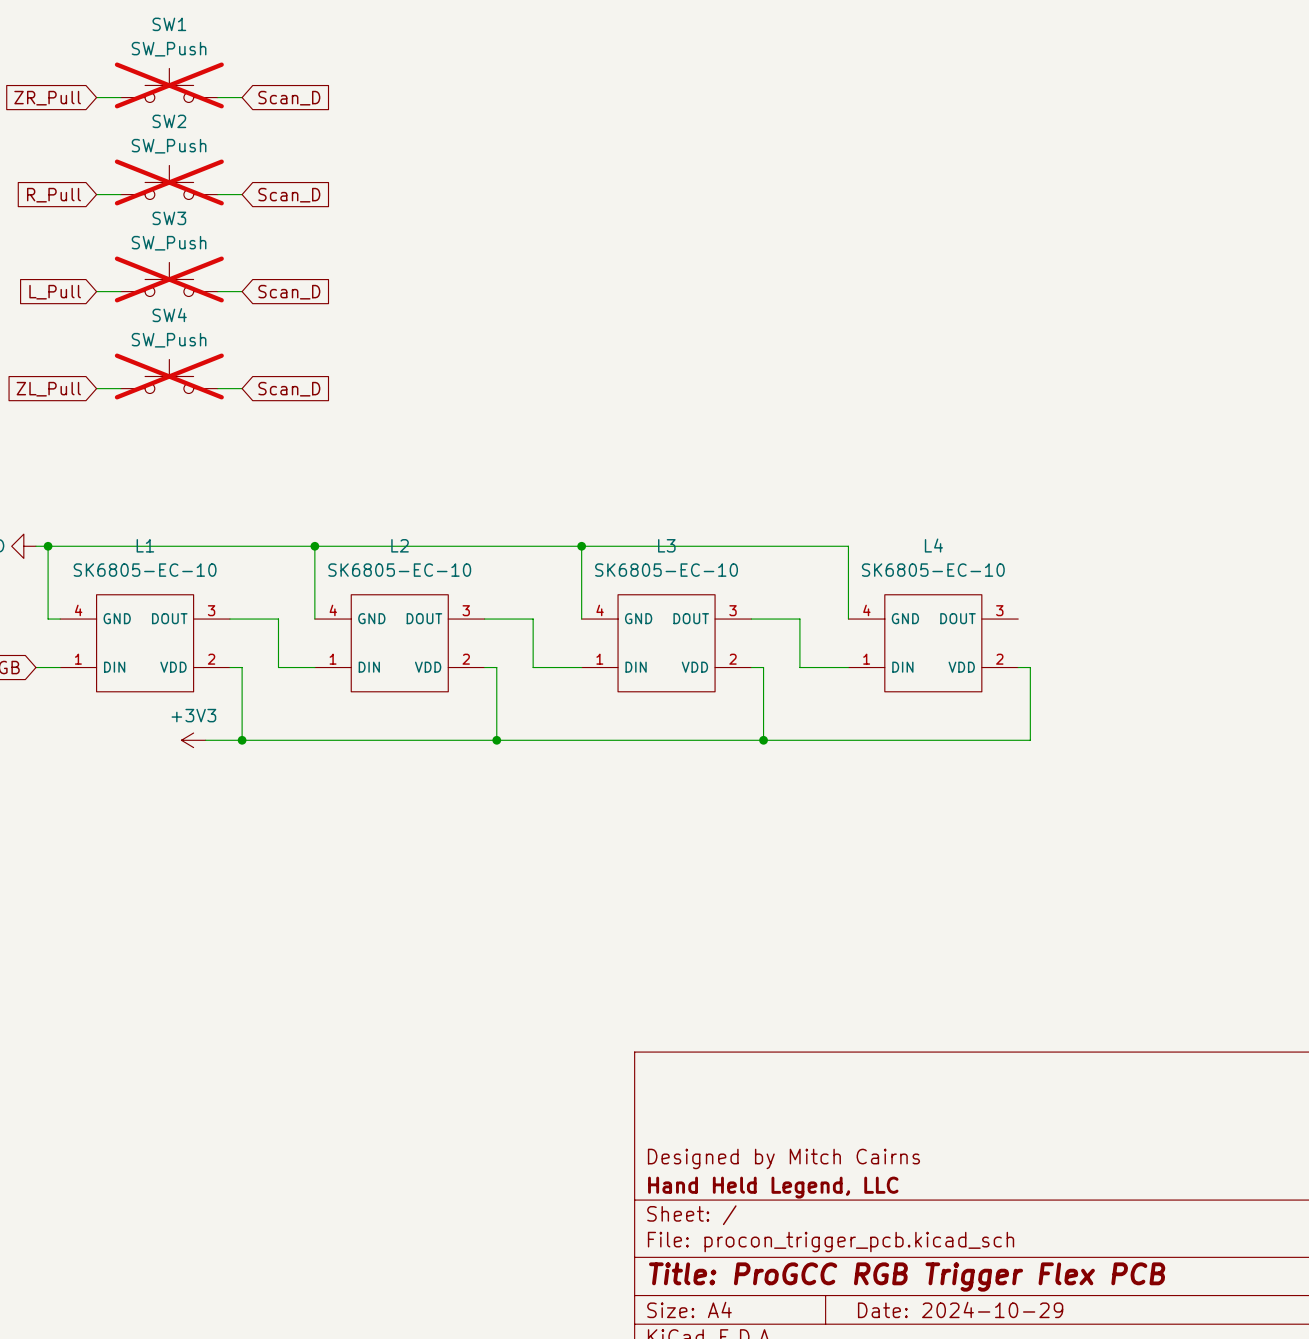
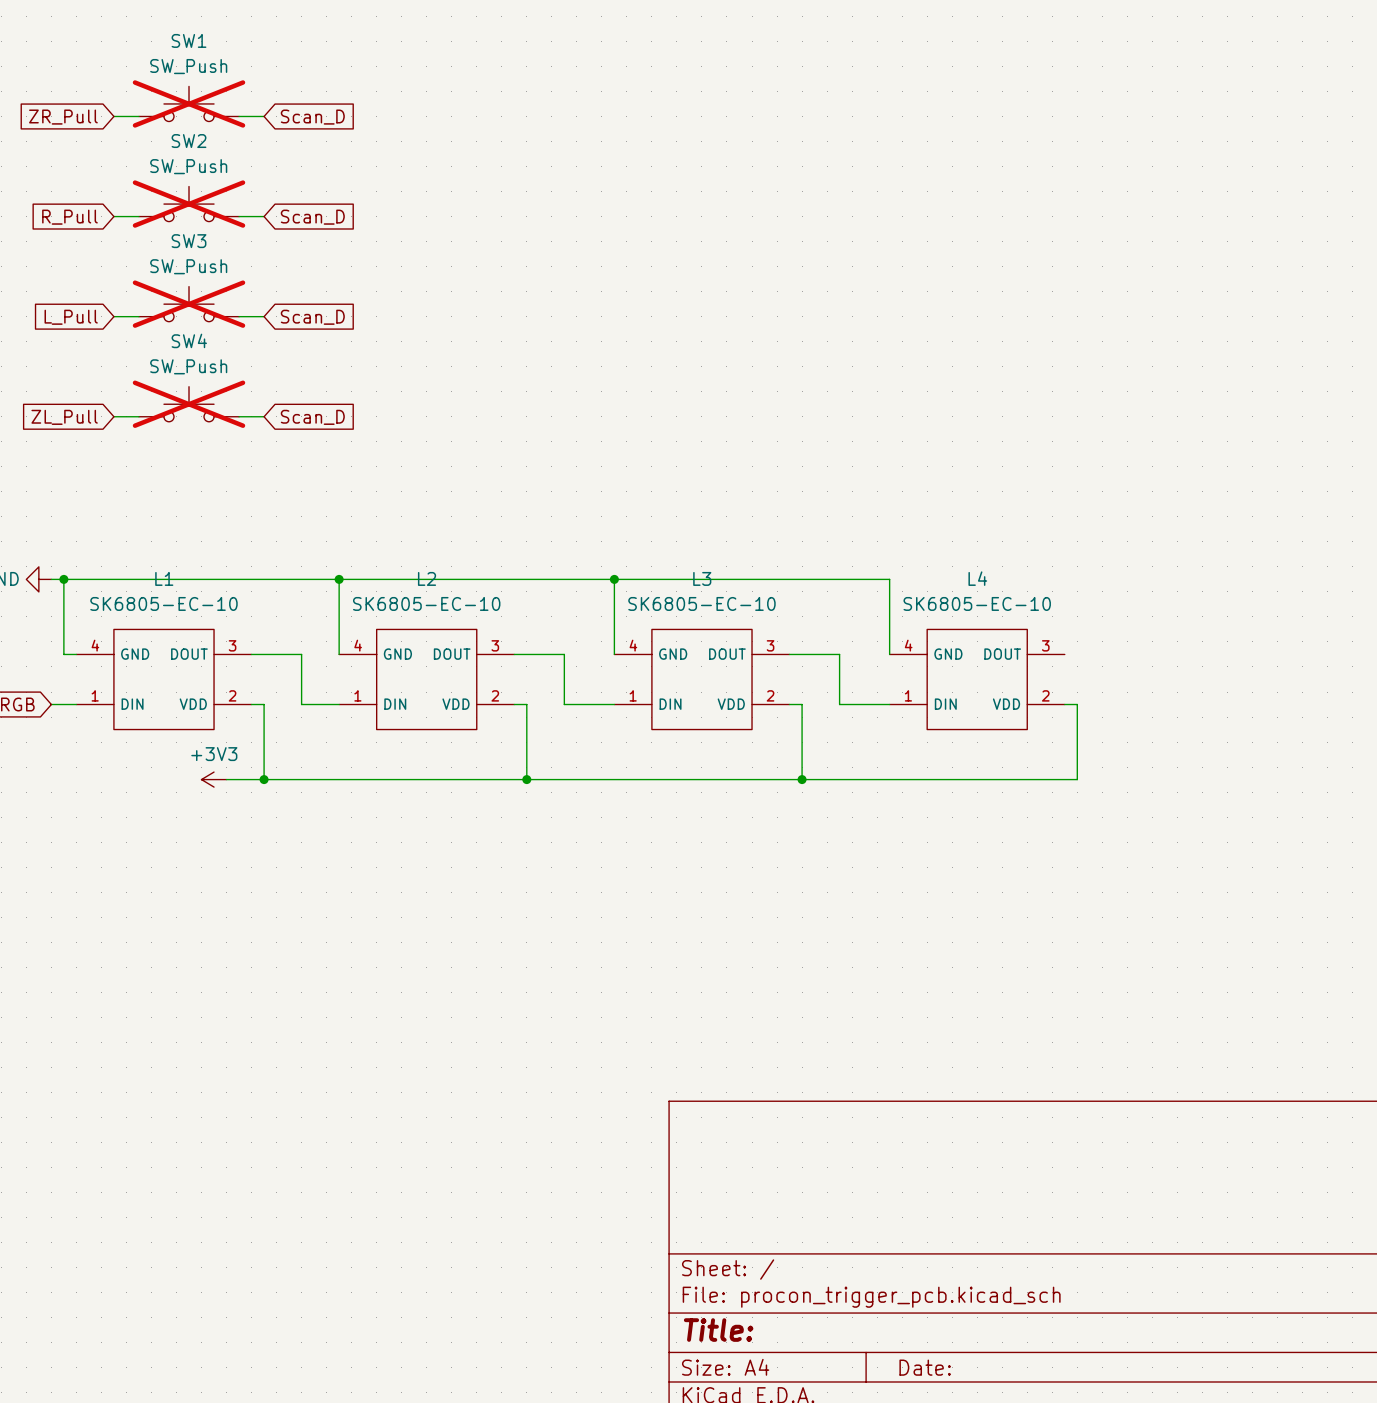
title block: Designed by Mitch Cairns (783, 1158) -> none
title block: Hand Held Legend, LLC (773, 1187) -> none
title block: Title: ProGCC RGB Trigger Flex PCB (907, 1277) -> Title: (718, 1330)
title block: Date: 2024-10-29 (960, 1309) -> Date: (925, 1367)

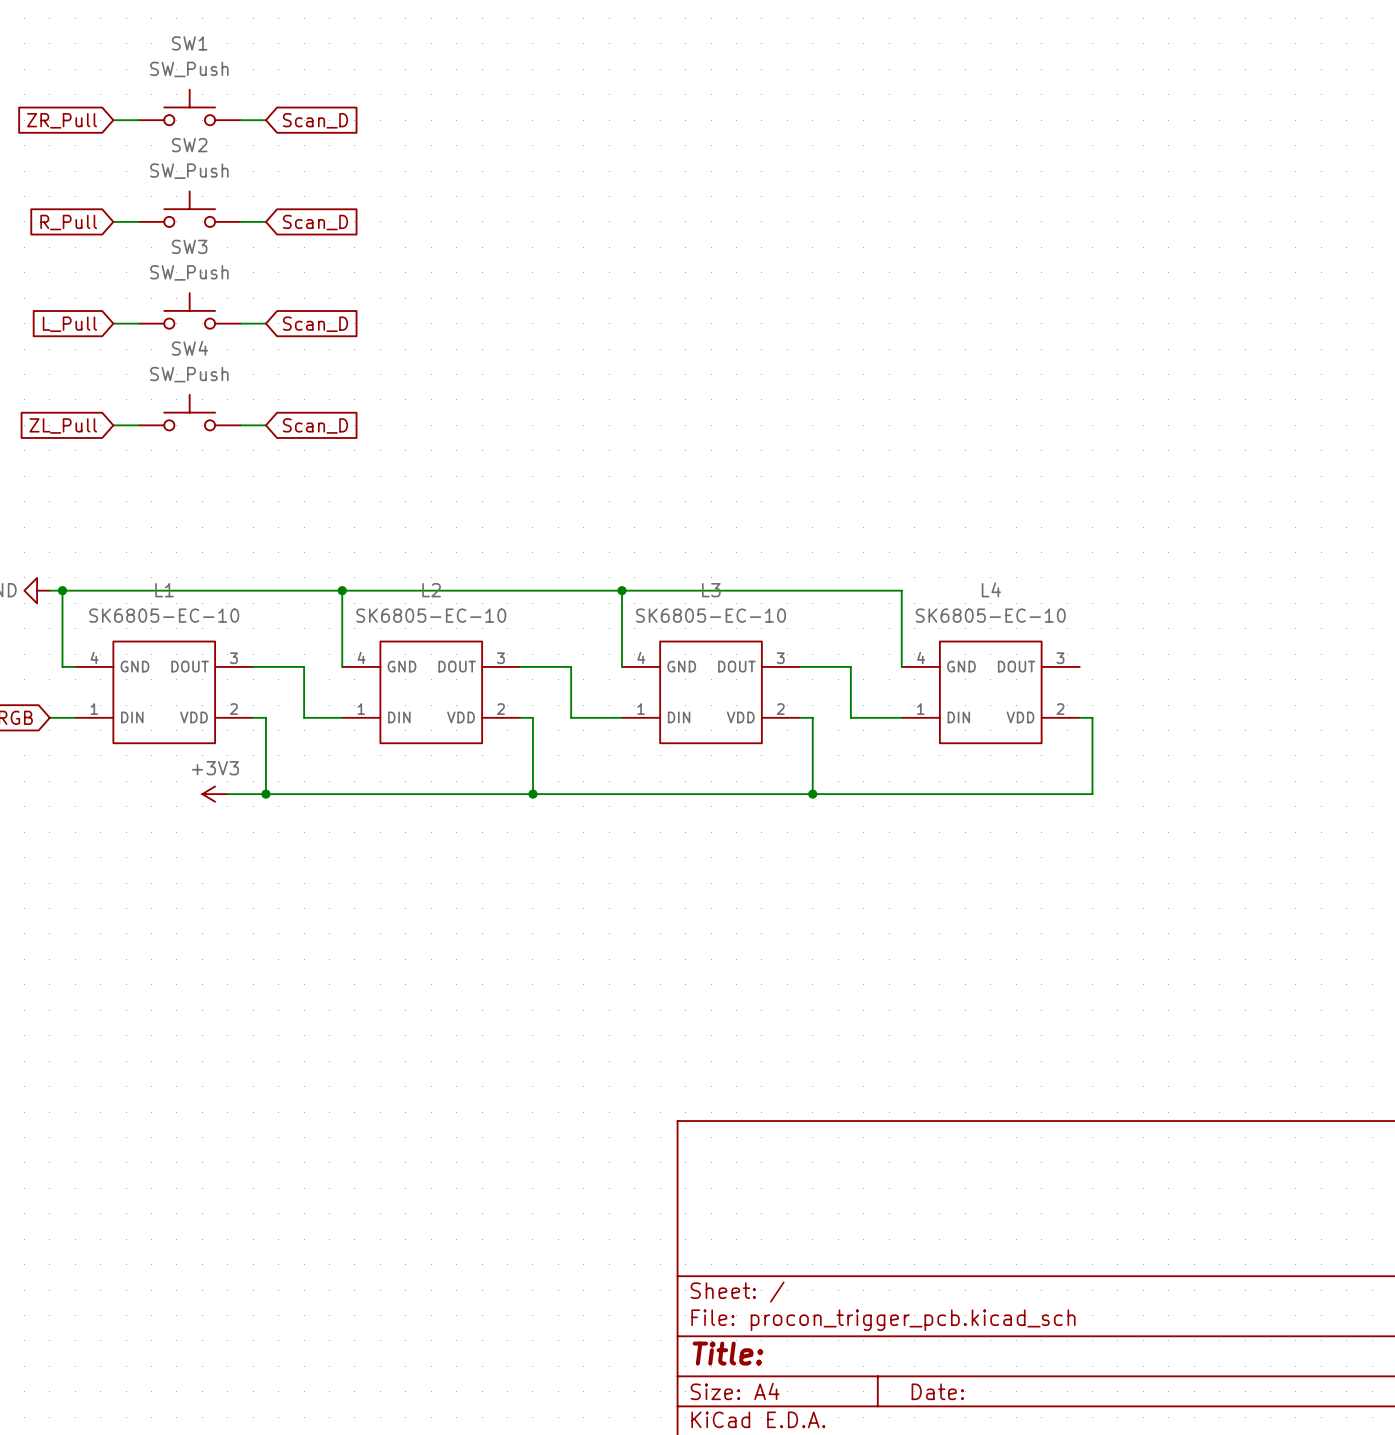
SW1 do-not-place cross: (189, 103) -> none
SW2 do-not-place cross: (189, 204) -> none
SW3 do-not-place cross: (189, 304) -> none
SW4 do-not-place cross: (189, 404) -> none

